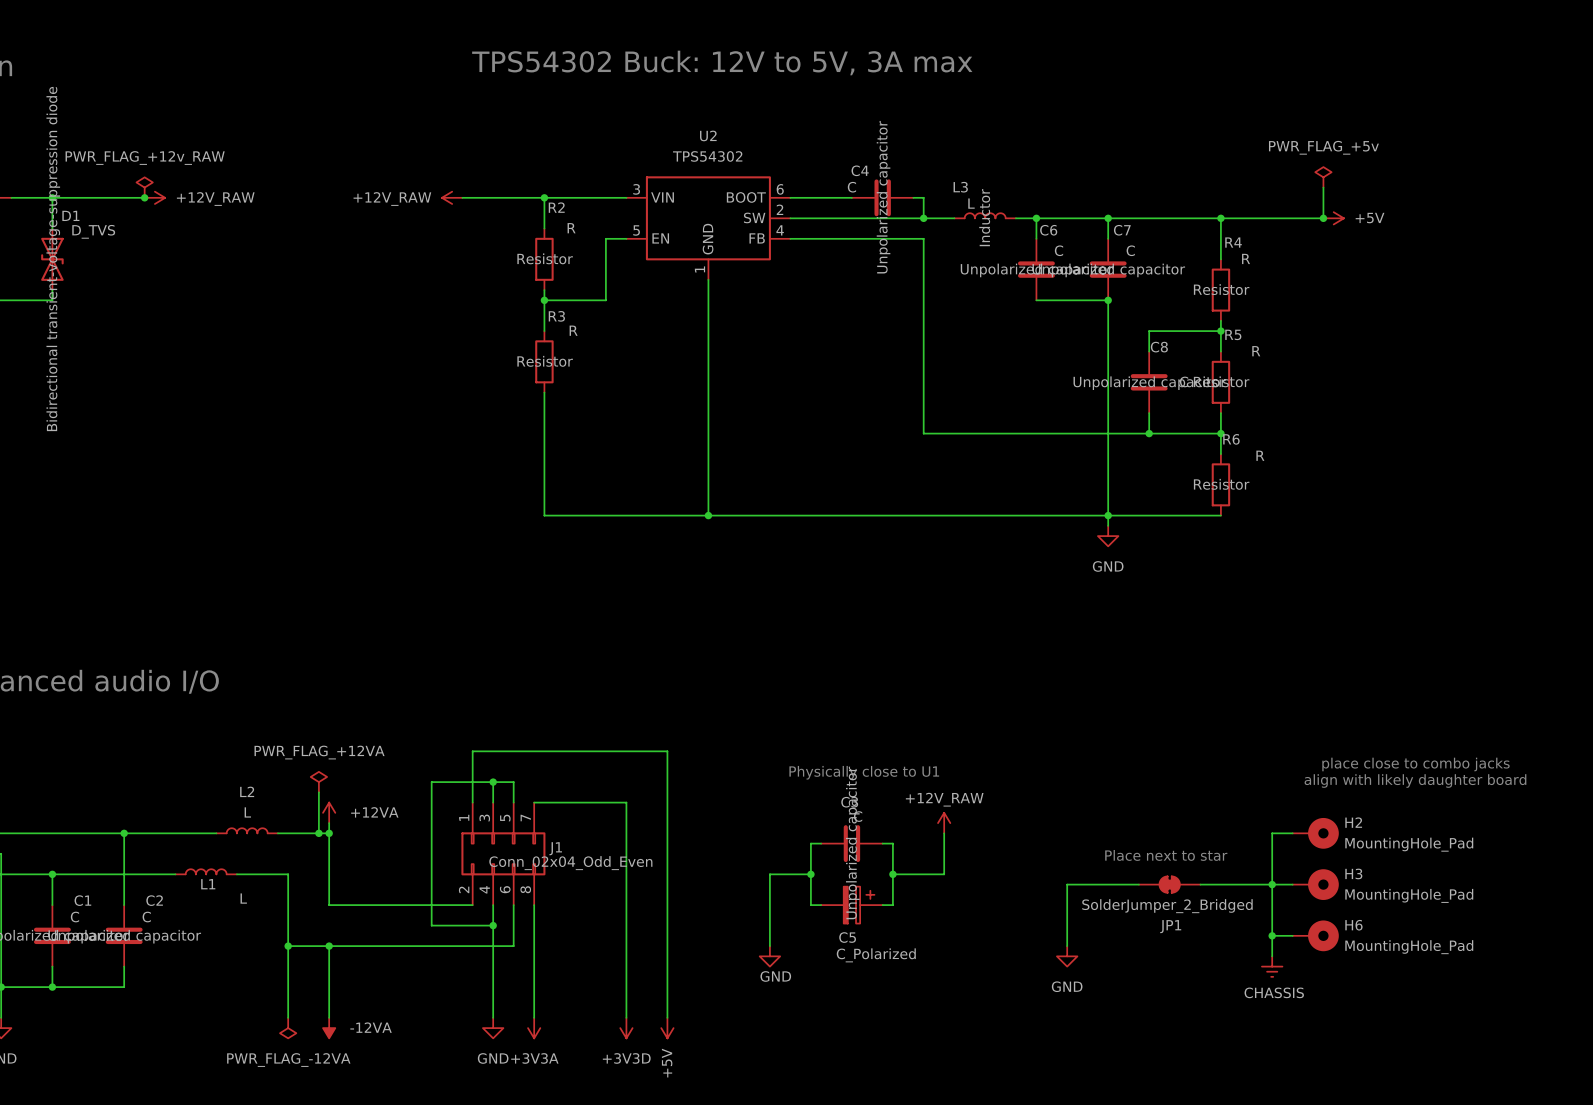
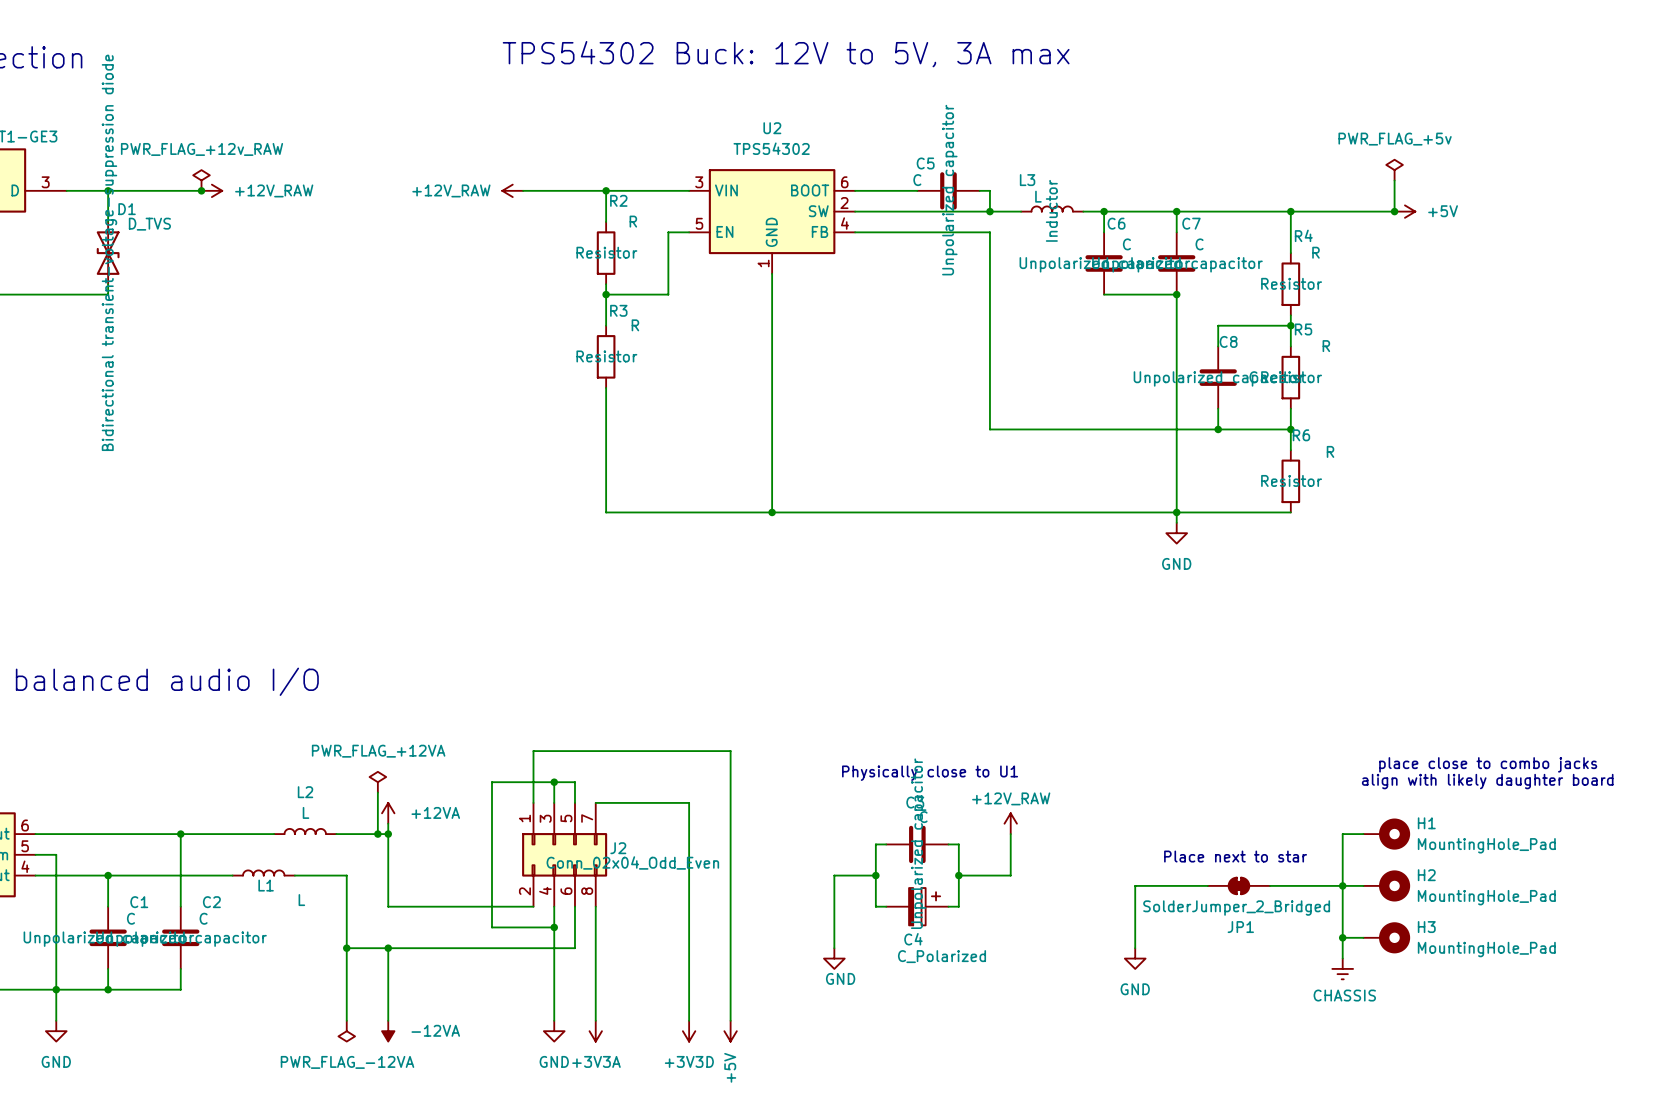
C4 name: C4 (860, 170) -> C5 (925, 163)
H2 name: H2 (1353, 822) -> H1 (1426, 823)
J1 name: J1 (555, 848) -> J2 (618, 848)
H3 name: H3 (1353, 873) -> H2 (1426, 875)
H6 name: H6 (1353, 925) -> H3 (1426, 927)
C5 name: C5 (847, 937) -> C4 (913, 939)

